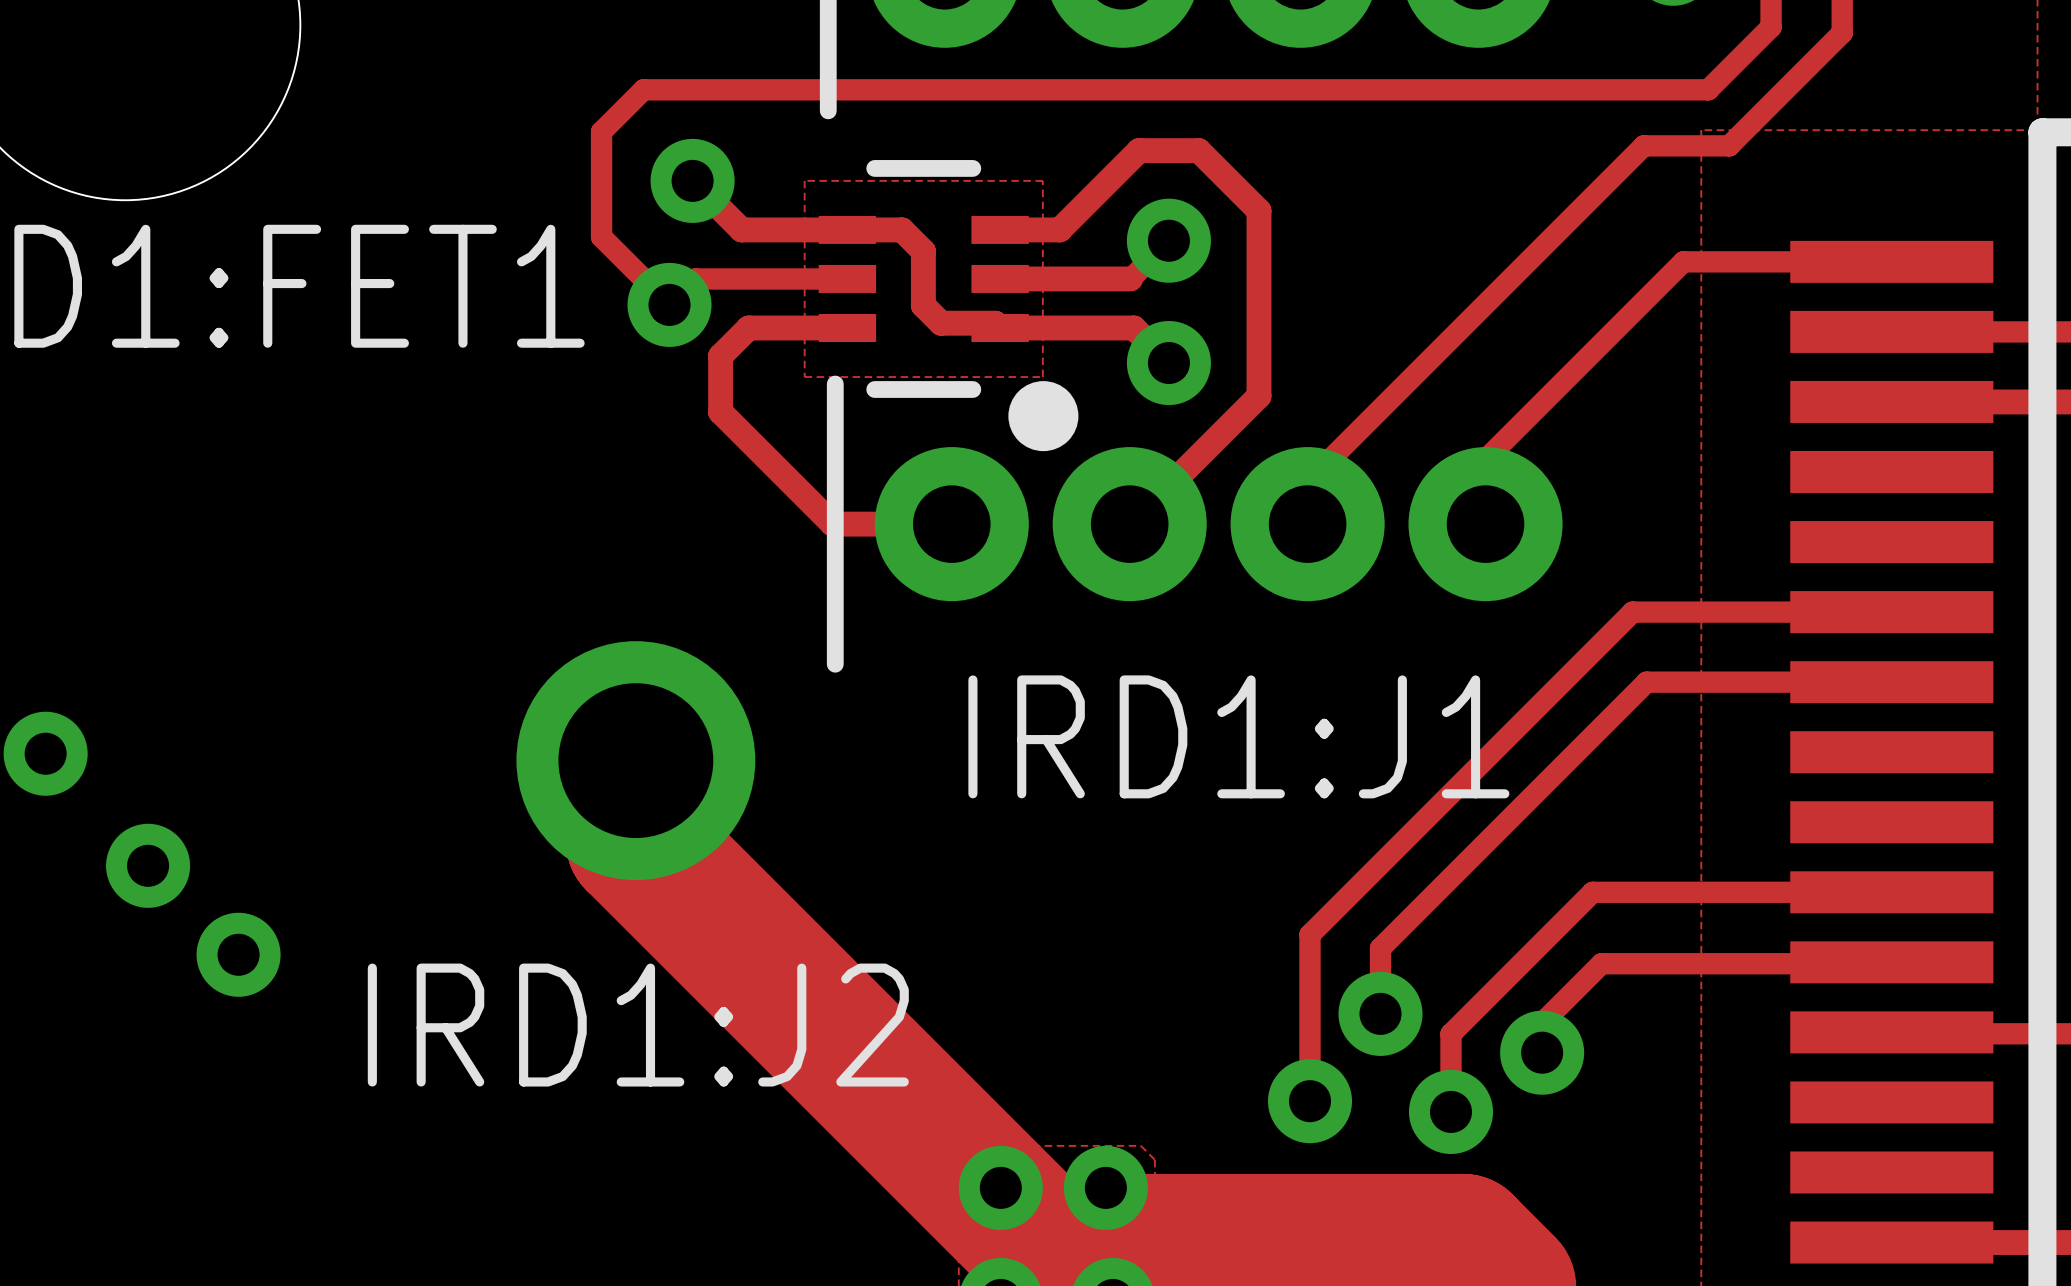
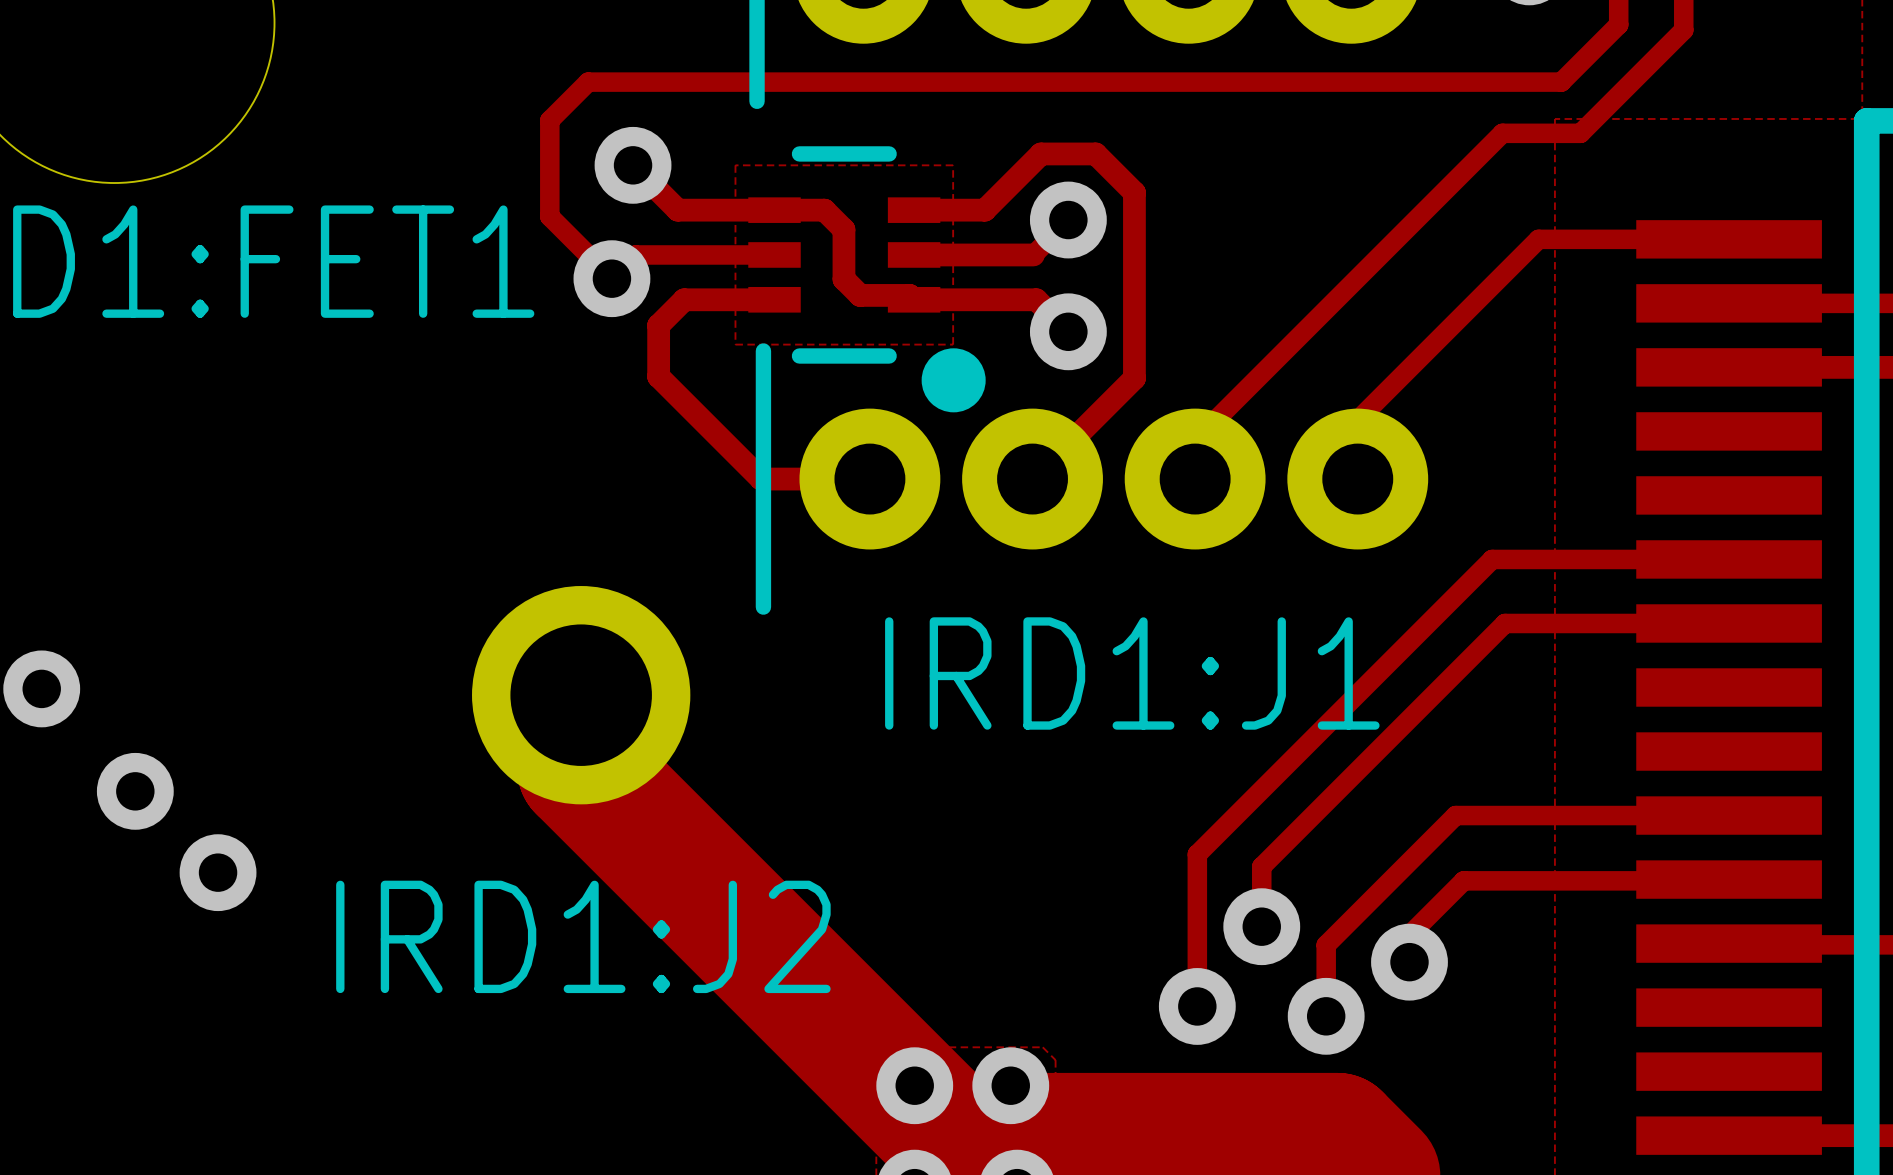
track: (1059, 229) (1138, 150) (1198, 150) (1258, 210) (1258, 396) (1241, 413) -> (968, 210) (984, 210) (1041, 153) (1095, 153) (1134, 192) (1134, 378)

